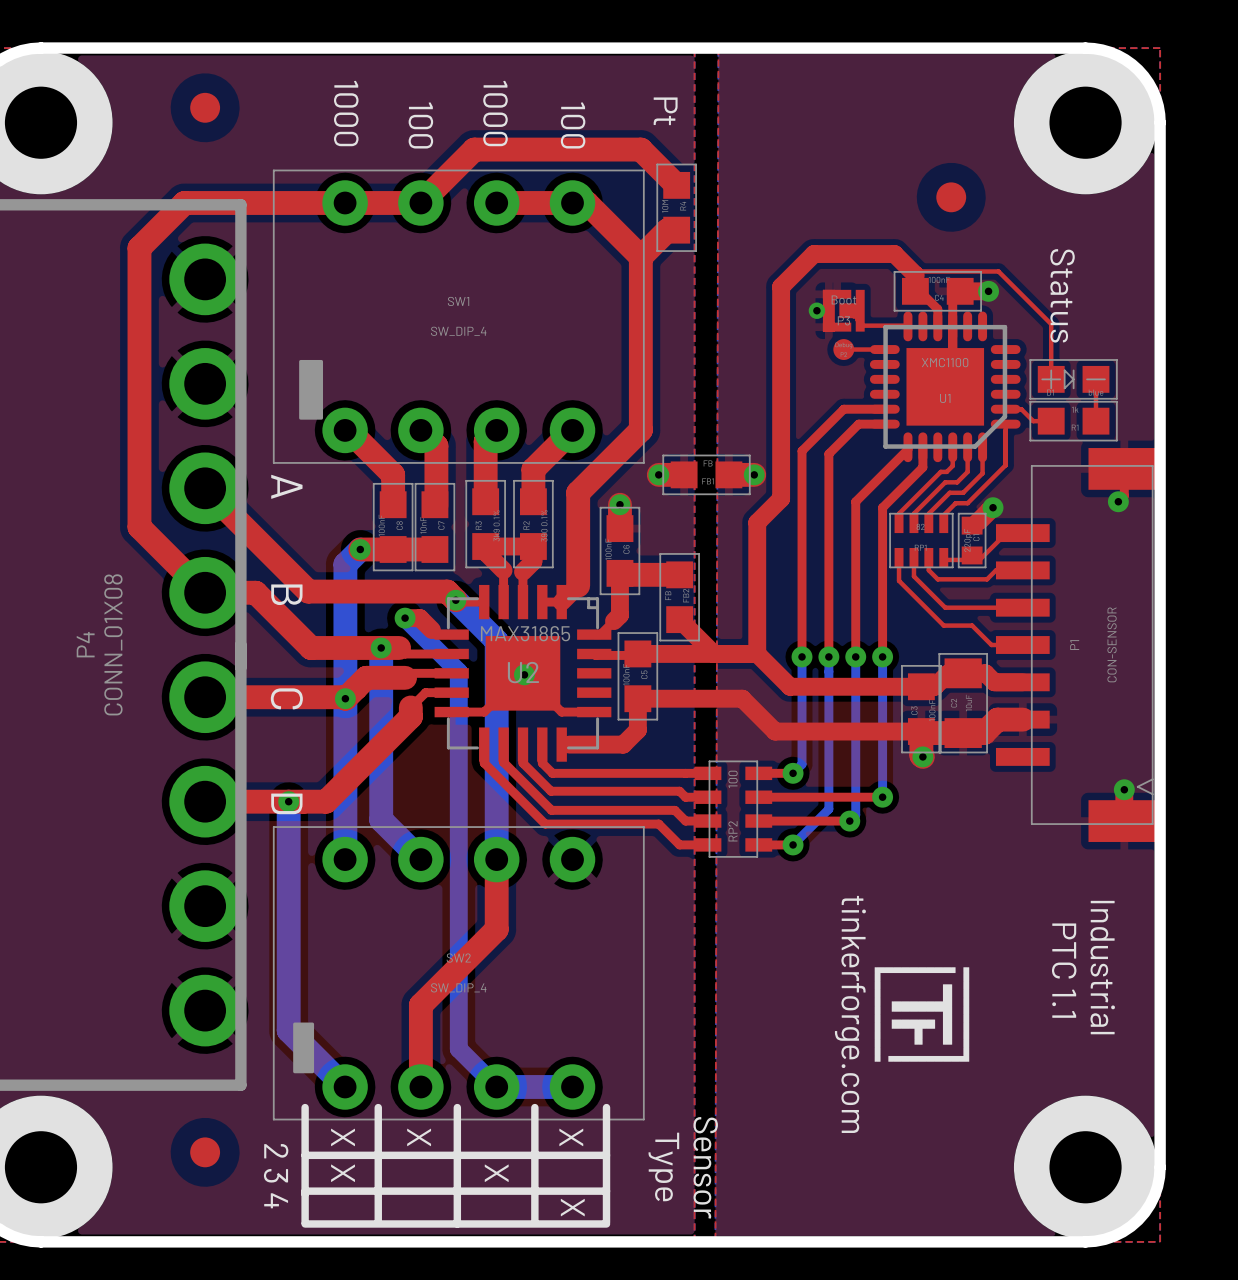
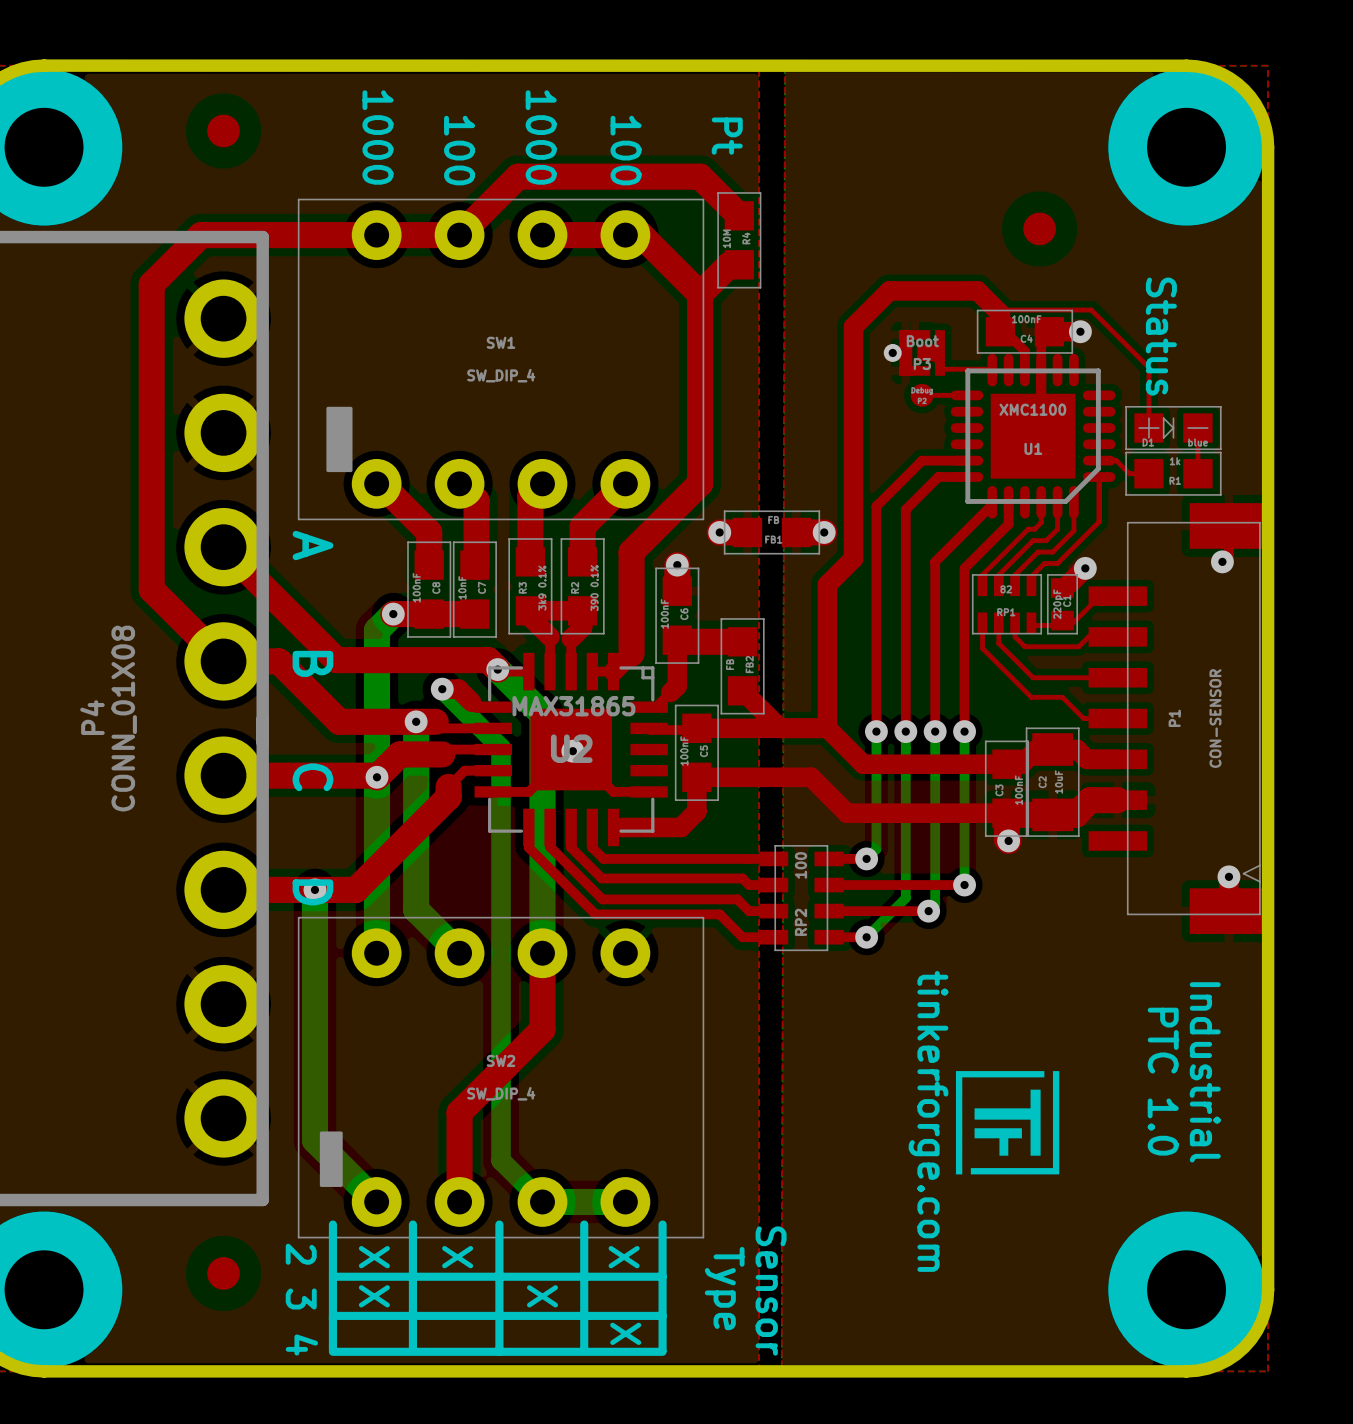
text: PTC 1.1 (1064, 970) -> PTC 1.0 (1163, 1081)

